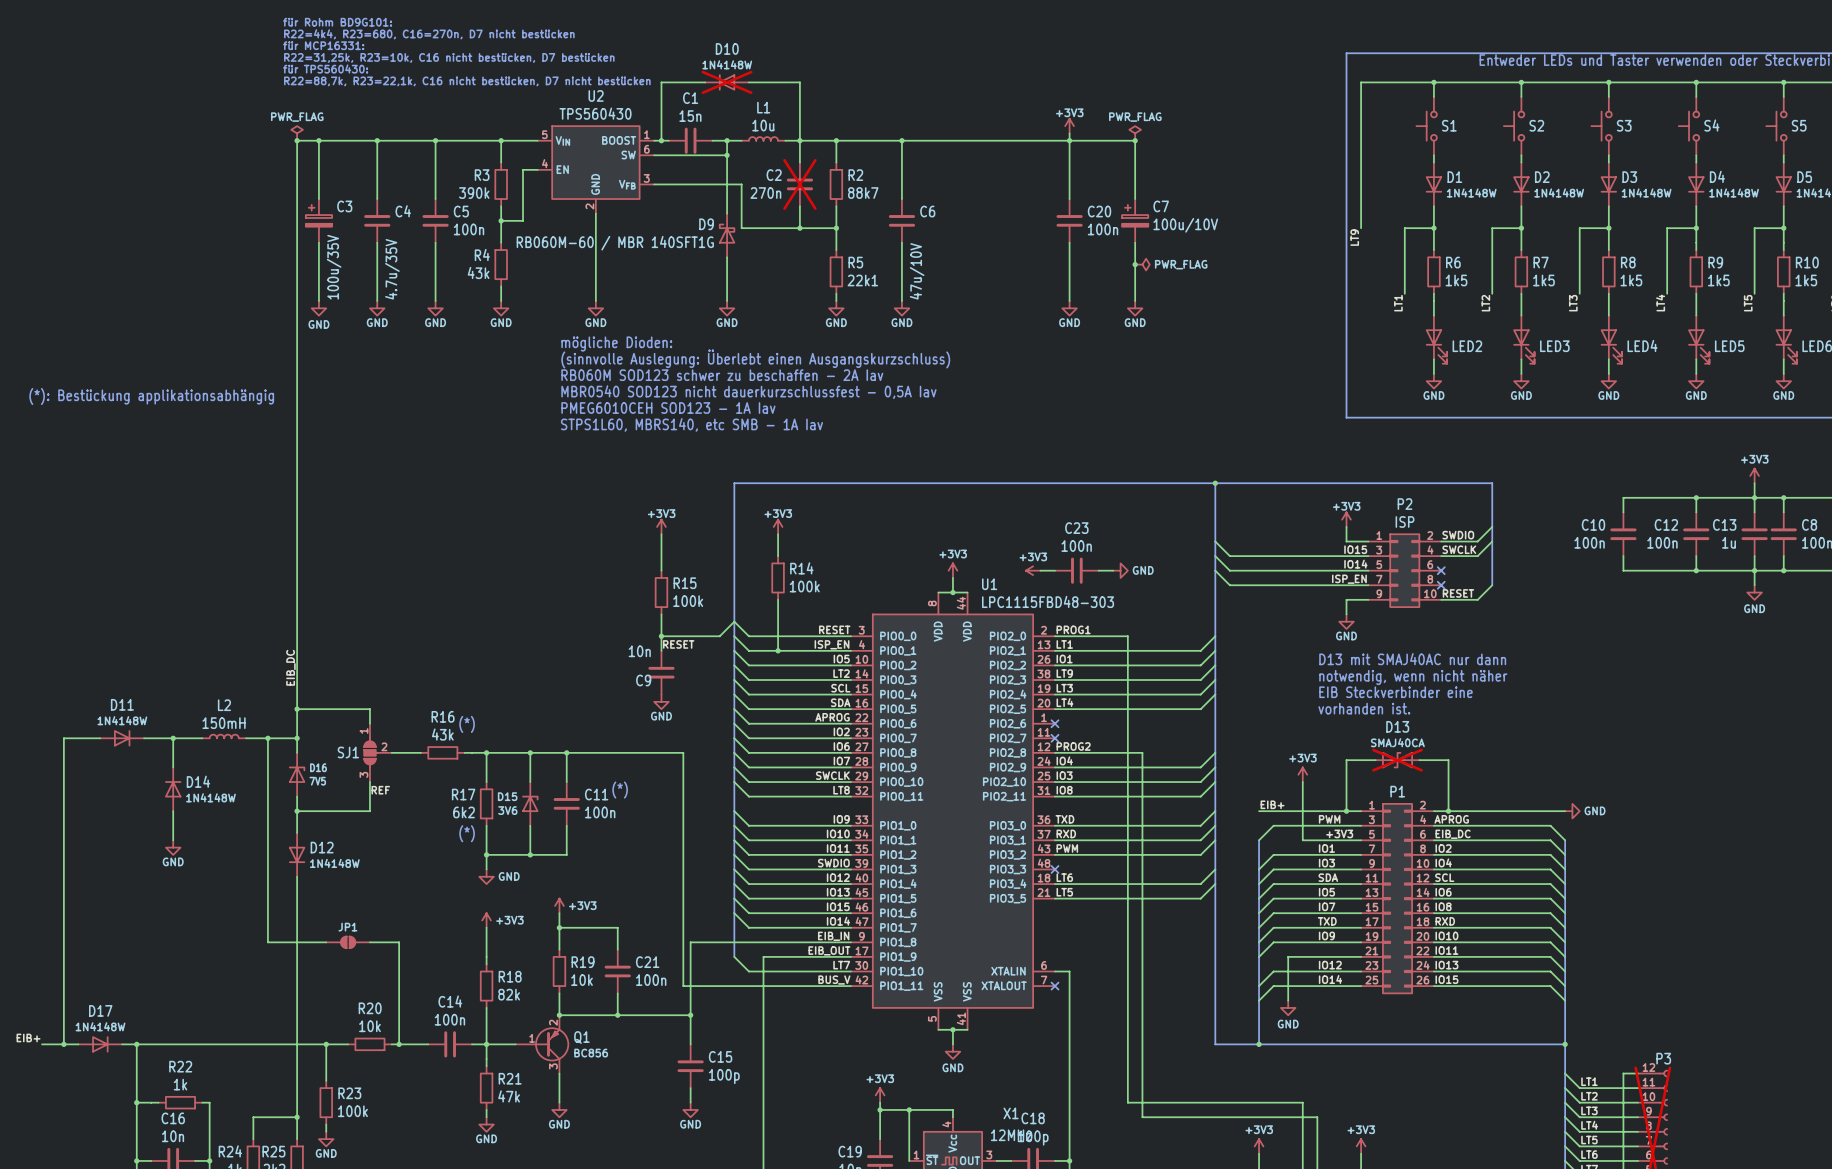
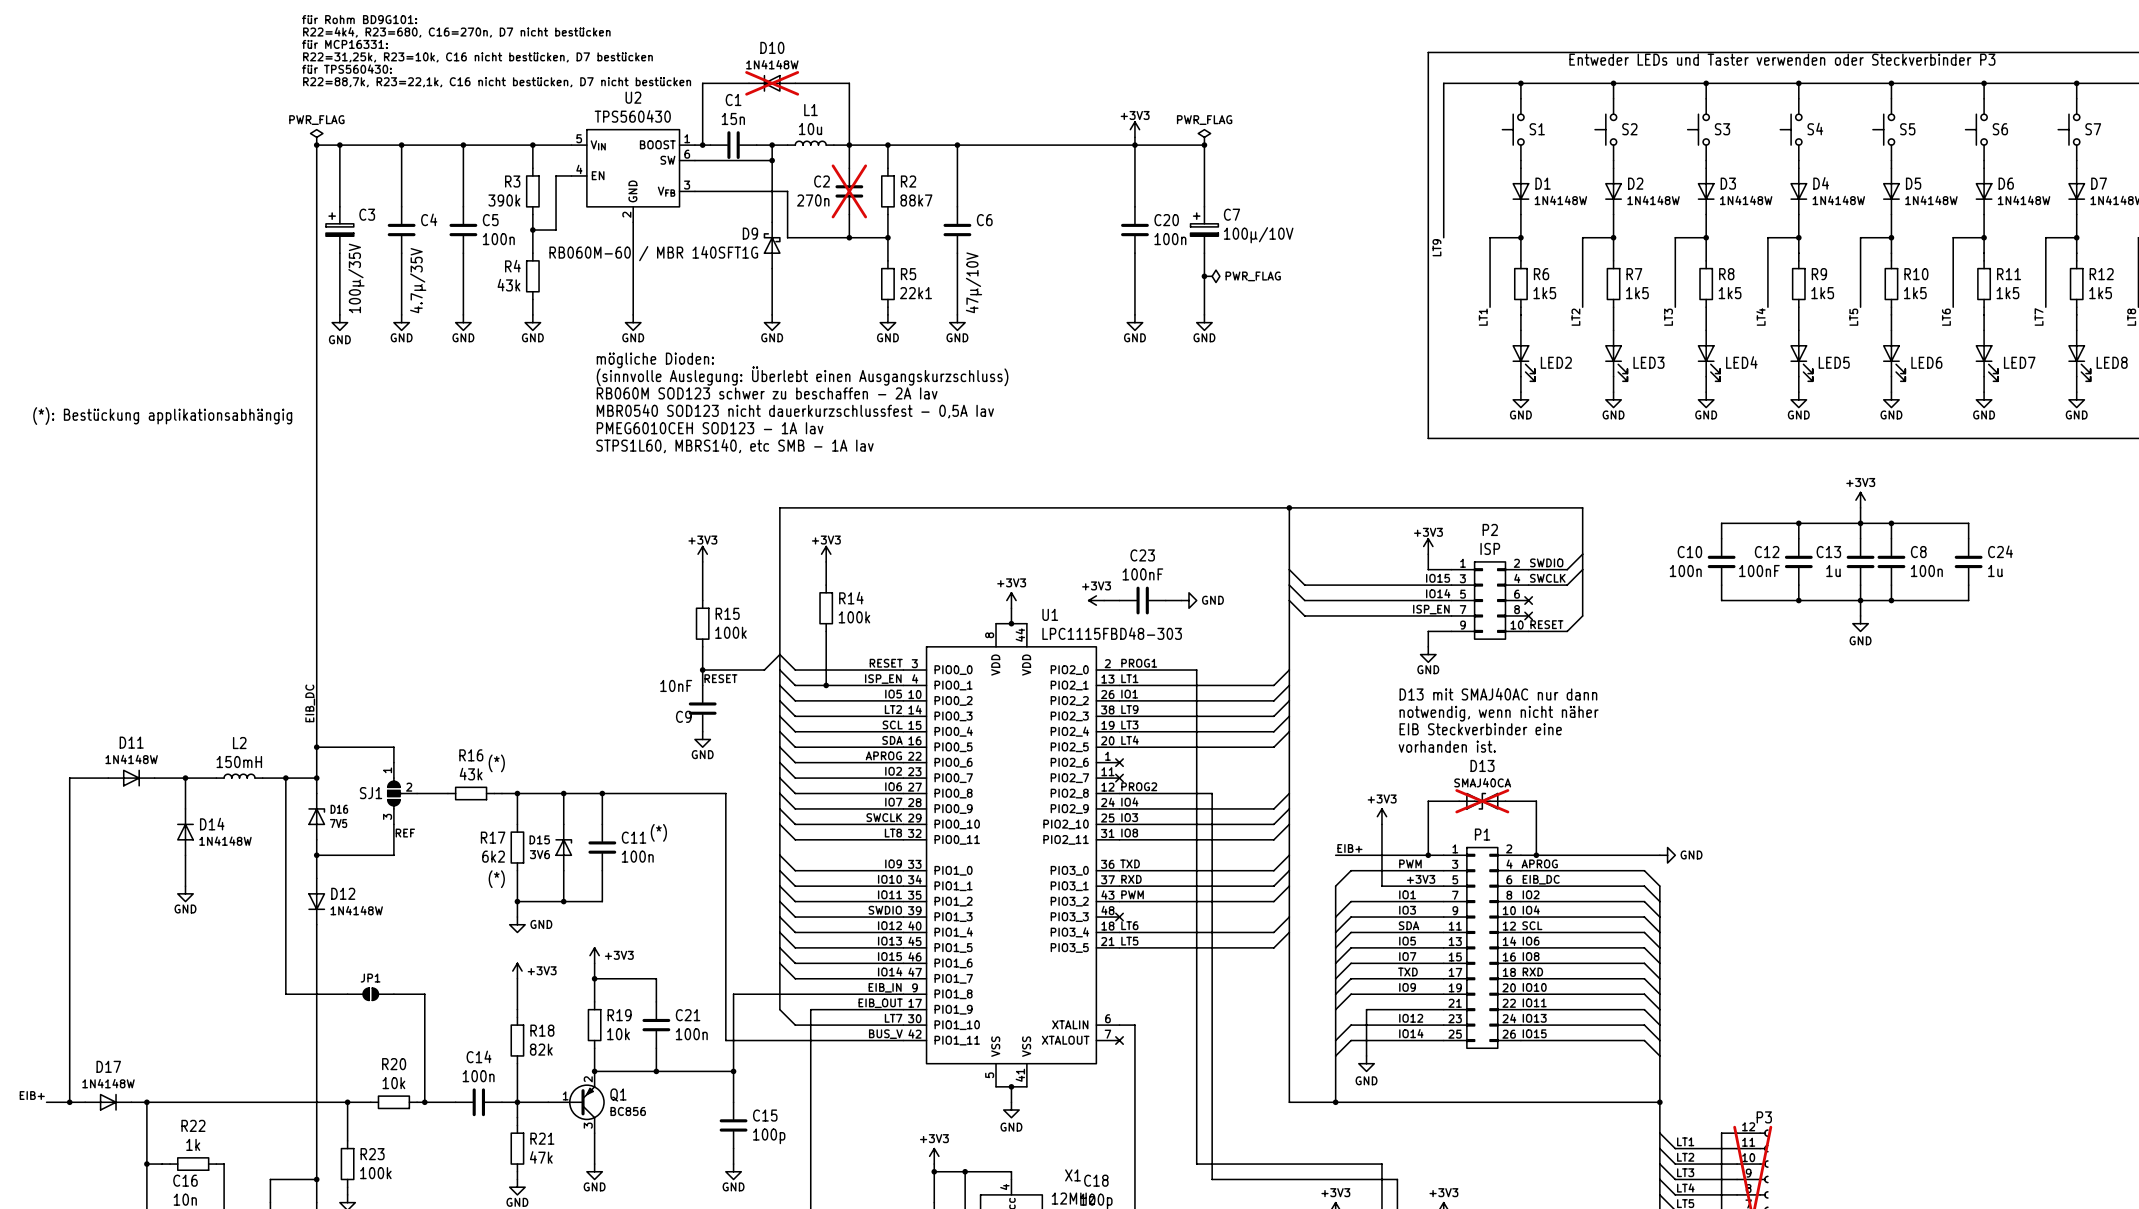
C7 value: 100u/10V (1185, 225) -> 100µ/10V (1258, 235)
C3 value: 100u/35V (334, 267) -> 100µ/35V (356, 278)
C4 value: 4.7u/35V (392, 269) -> 4.7µ/35V (418, 280)
C6 value: 47u/10V (917, 271) -> 47µ/10V (973, 282)
C12 value: 100n (1662, 542) -> 100nF (1759, 571)
C23 value: 100n (1076, 546) -> 100nF (1142, 574)
C9 value: 10n (639, 651) -> 10nF (676, 685)

